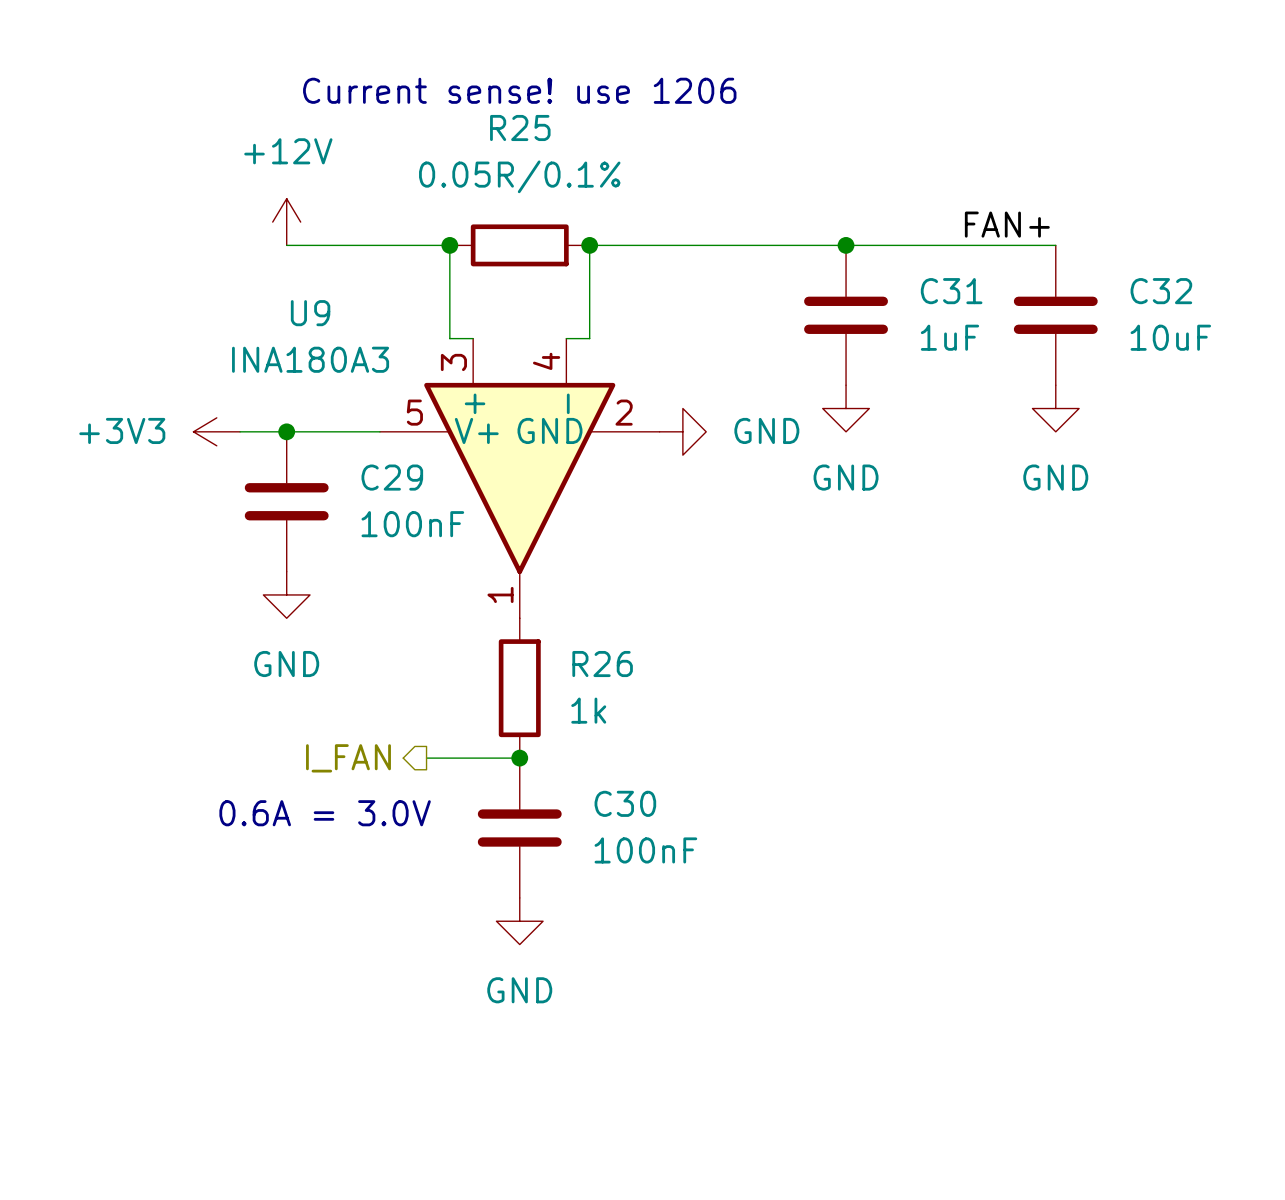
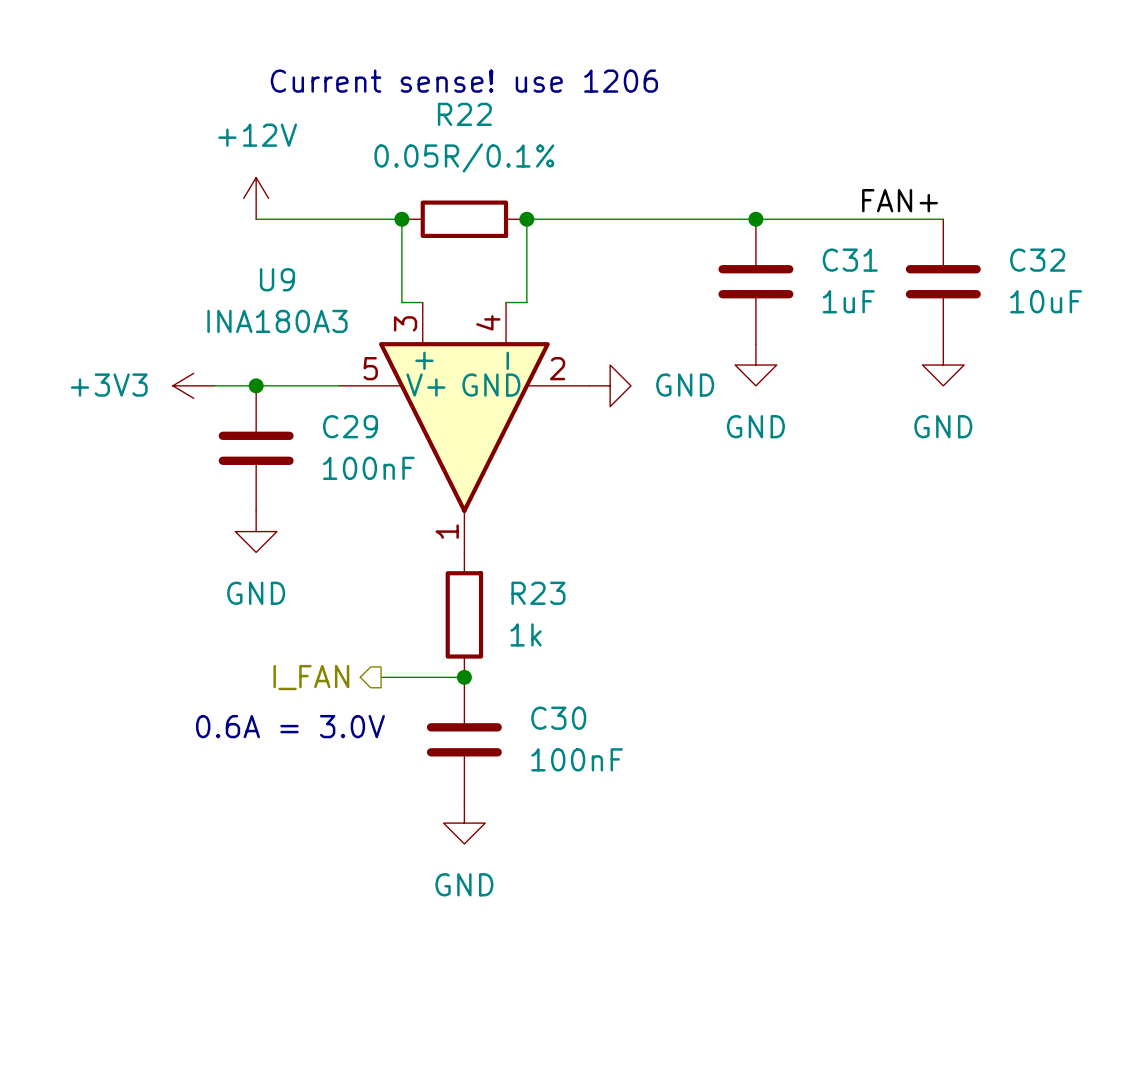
R25 name: R25 (520, 127) -> R22 (464, 114)
R26 name: R26 (602, 664) -> R23 (538, 593)

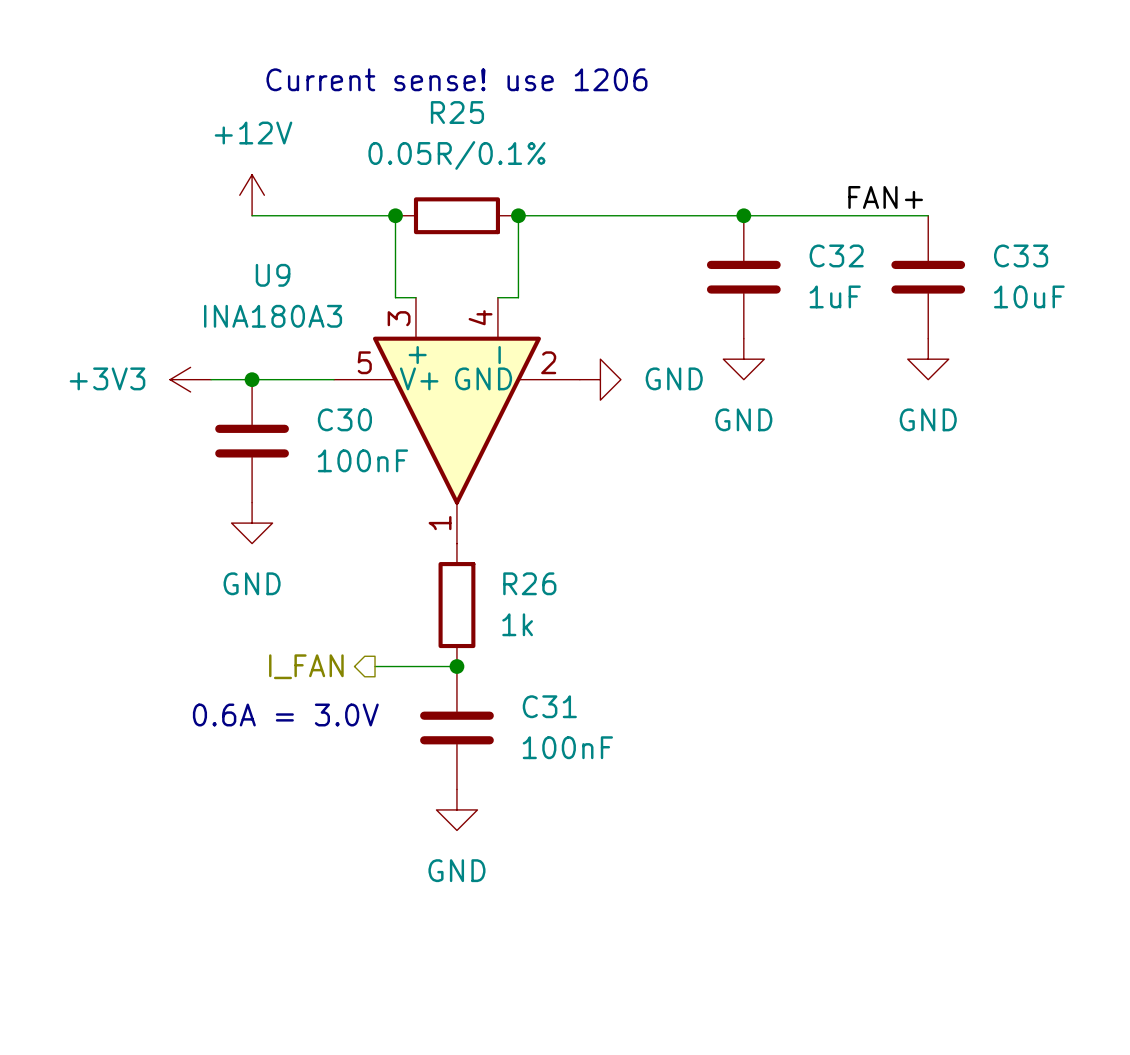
R22 name: R22 (464, 114) -> R25 (457, 112)
C31 name: C31 (850, 260) -> C32 (836, 255)
C32 name: C32 (1037, 260) -> C33 (1021, 255)
C29 name: C29 (350, 426) -> C30 (344, 419)
R23 name: R23 (538, 593) -> R26 (529, 583)
C30 name: C30 (558, 718) -> C31 (549, 706)

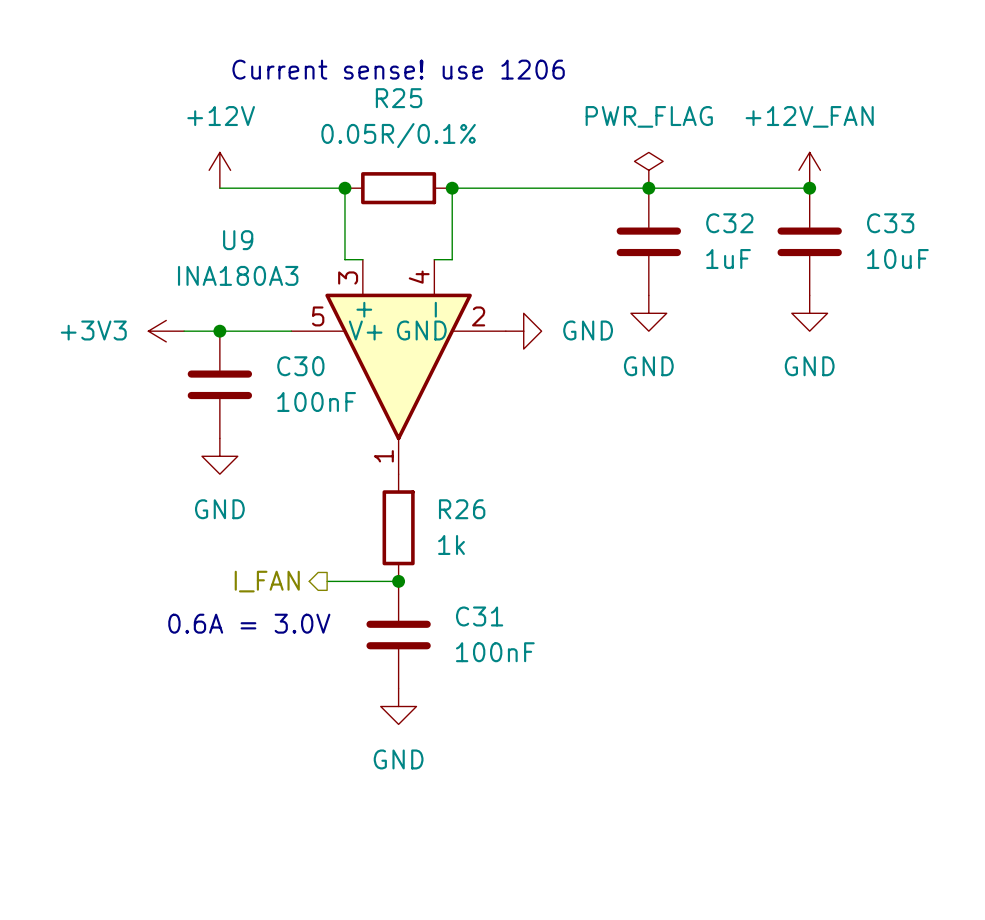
power symbol: none -> PWR_FLAG (648, 170)
power symbol: none -> +12V_FAN (809, 170)
label: FAN+ (885, 197) -> none
junction: none -> (809, 188)

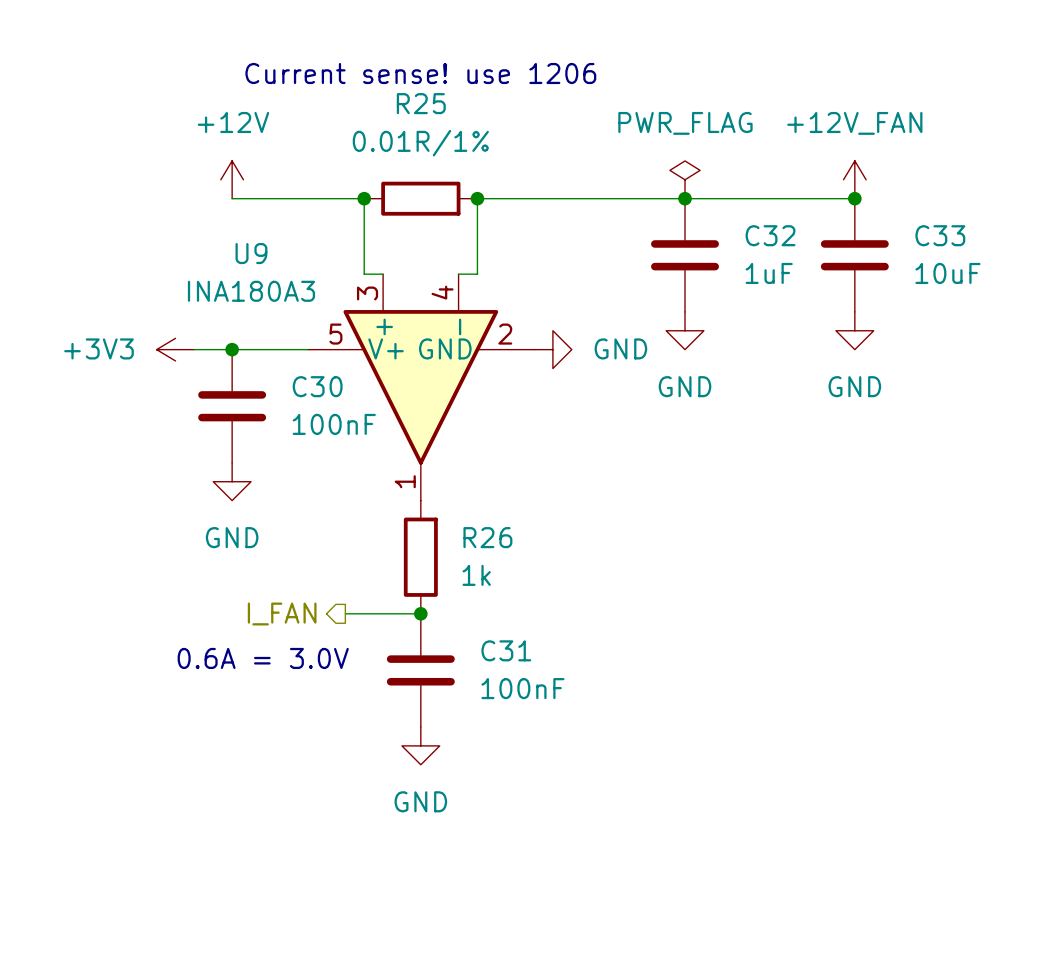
R25 value: 0.05R/0.1% (398, 135) -> 0.01R/1% (420, 143)

